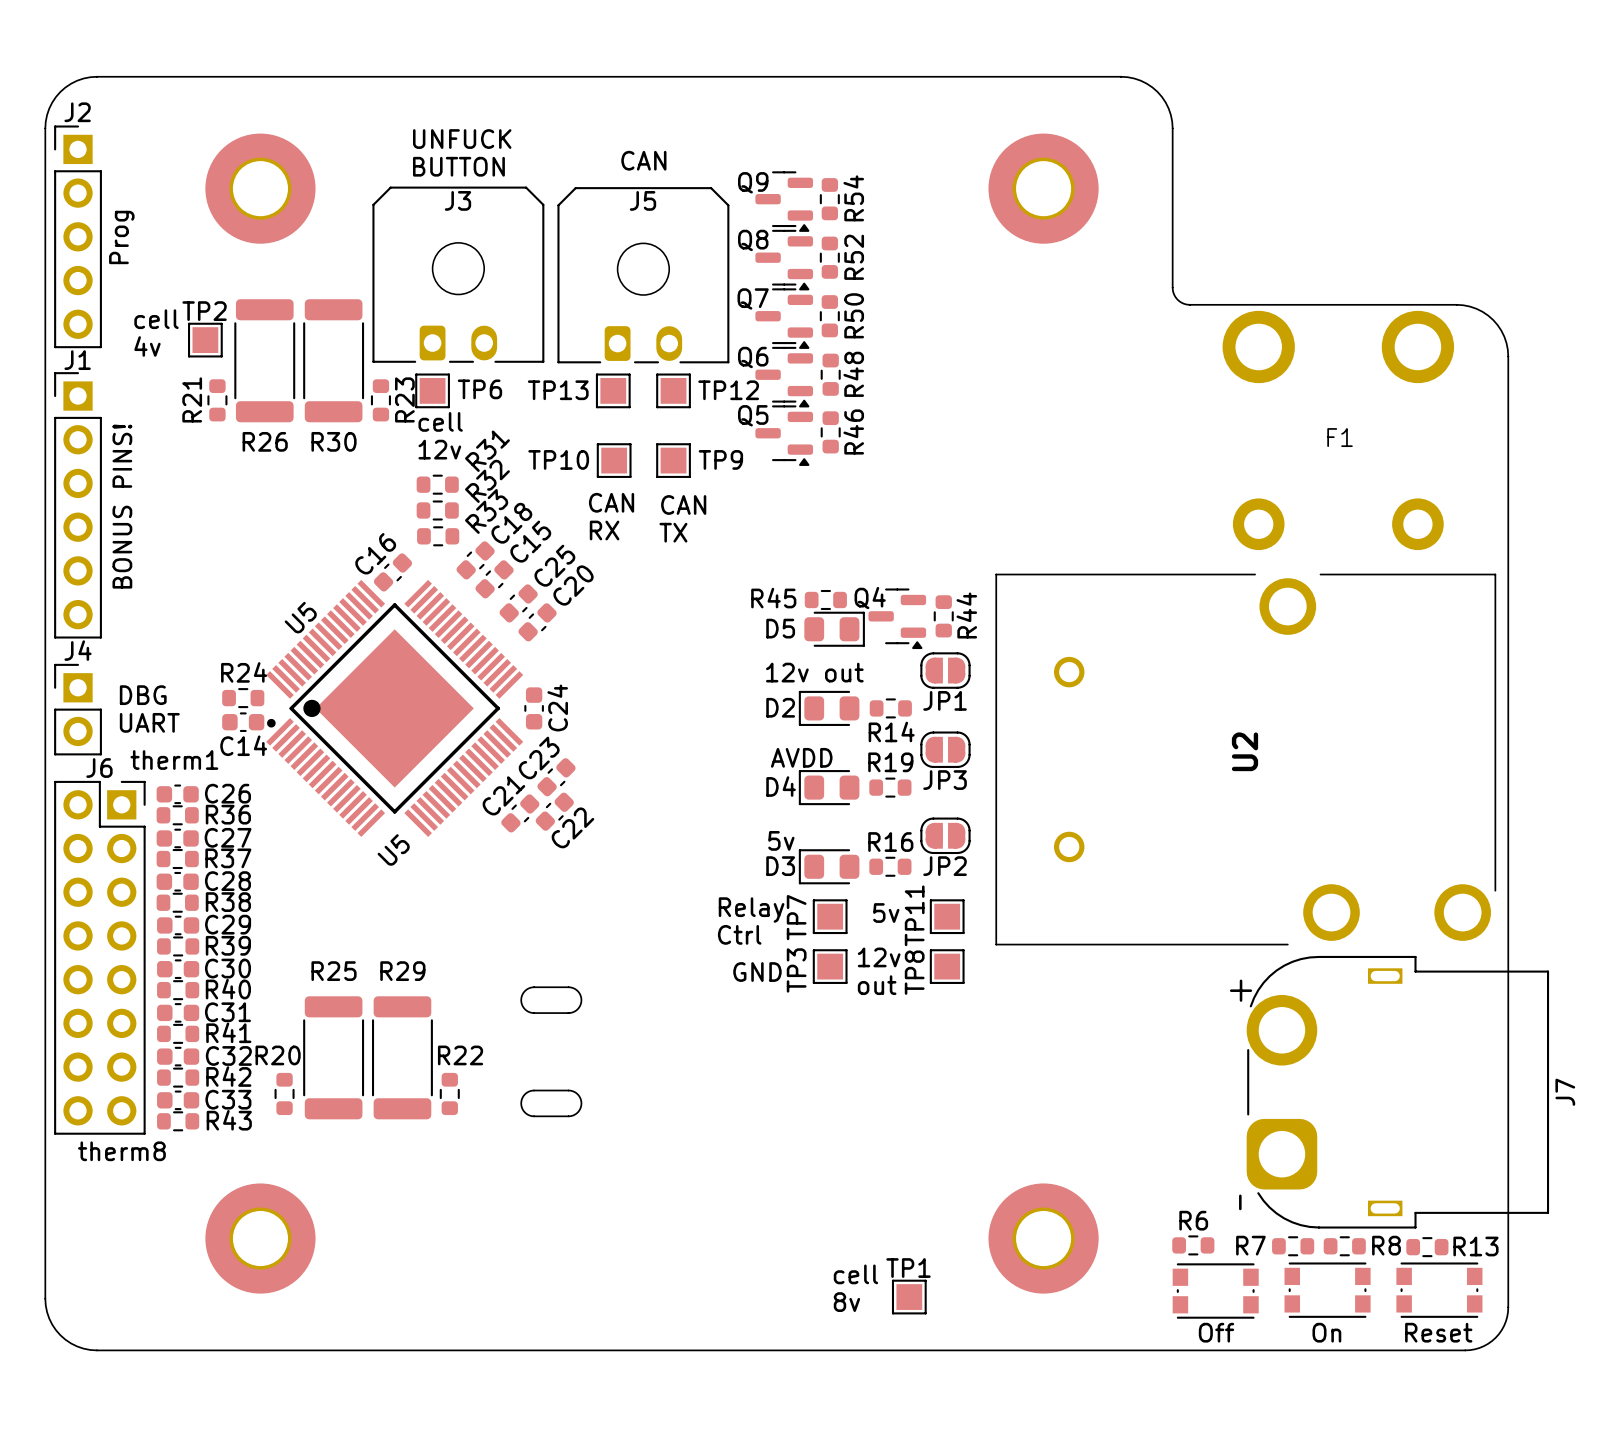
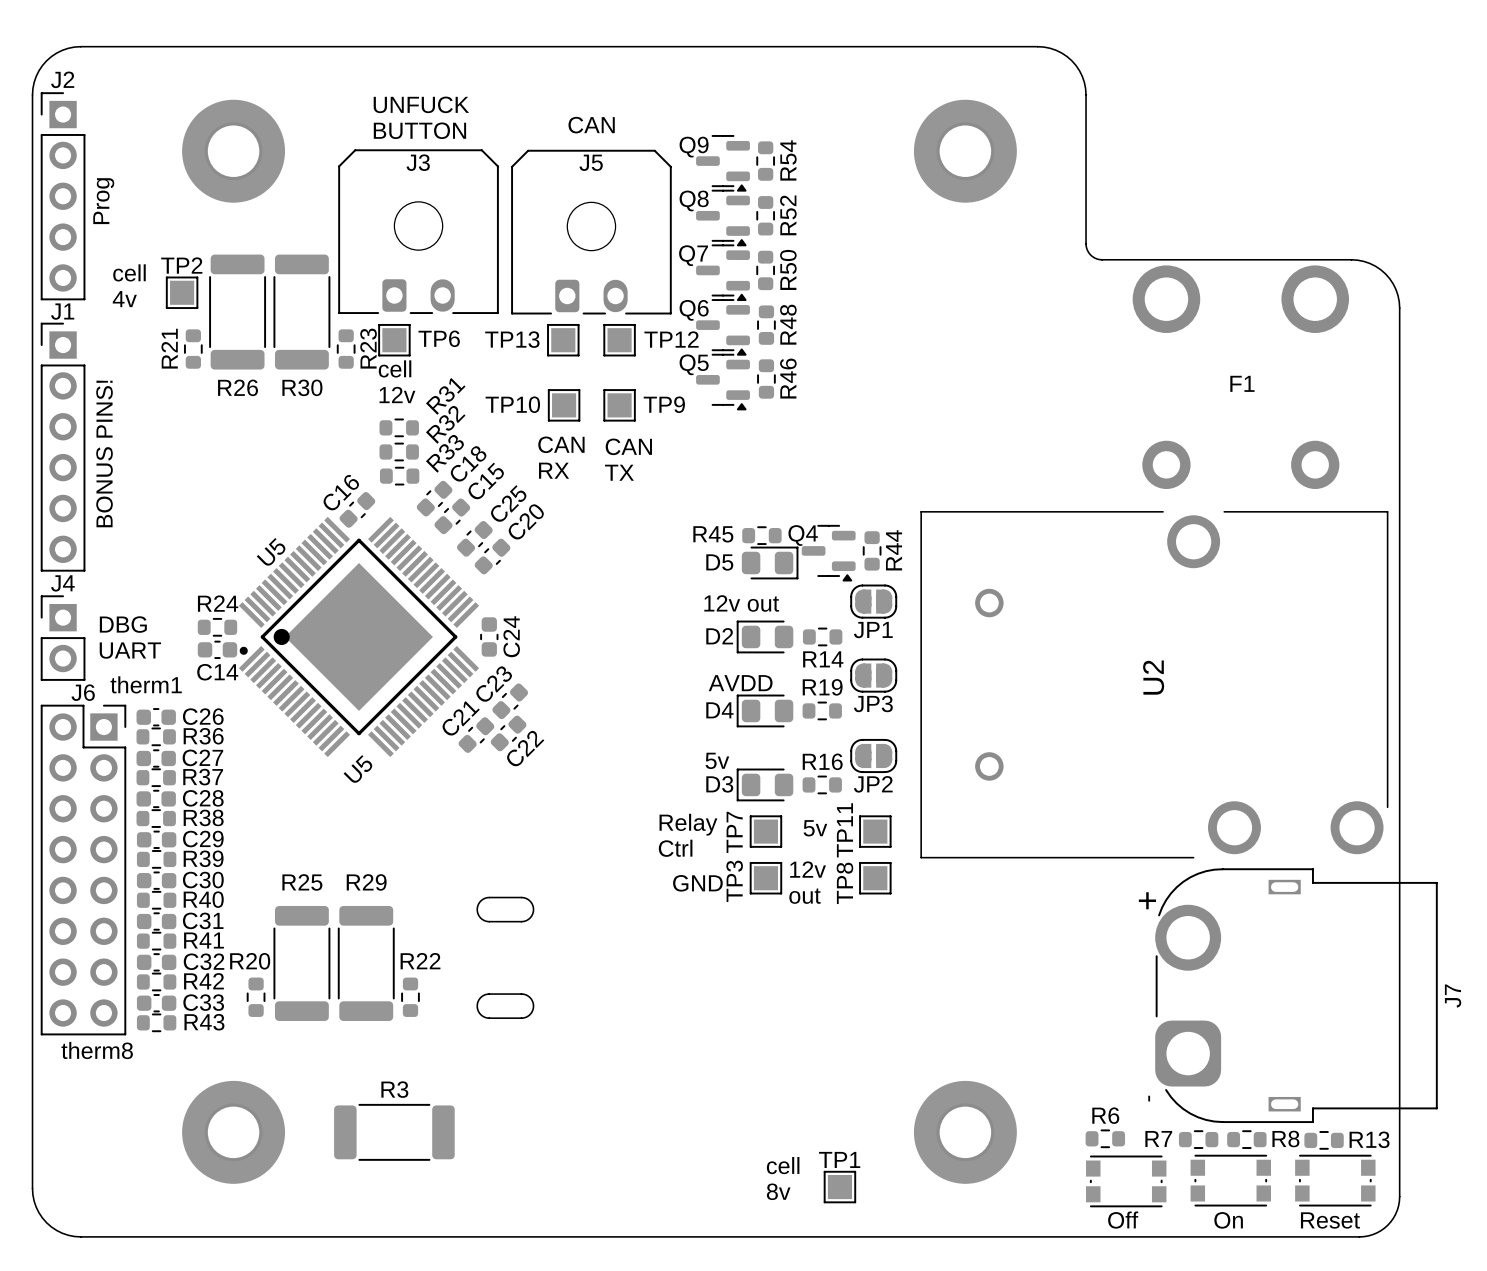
R3: none -> (394, 1132)

